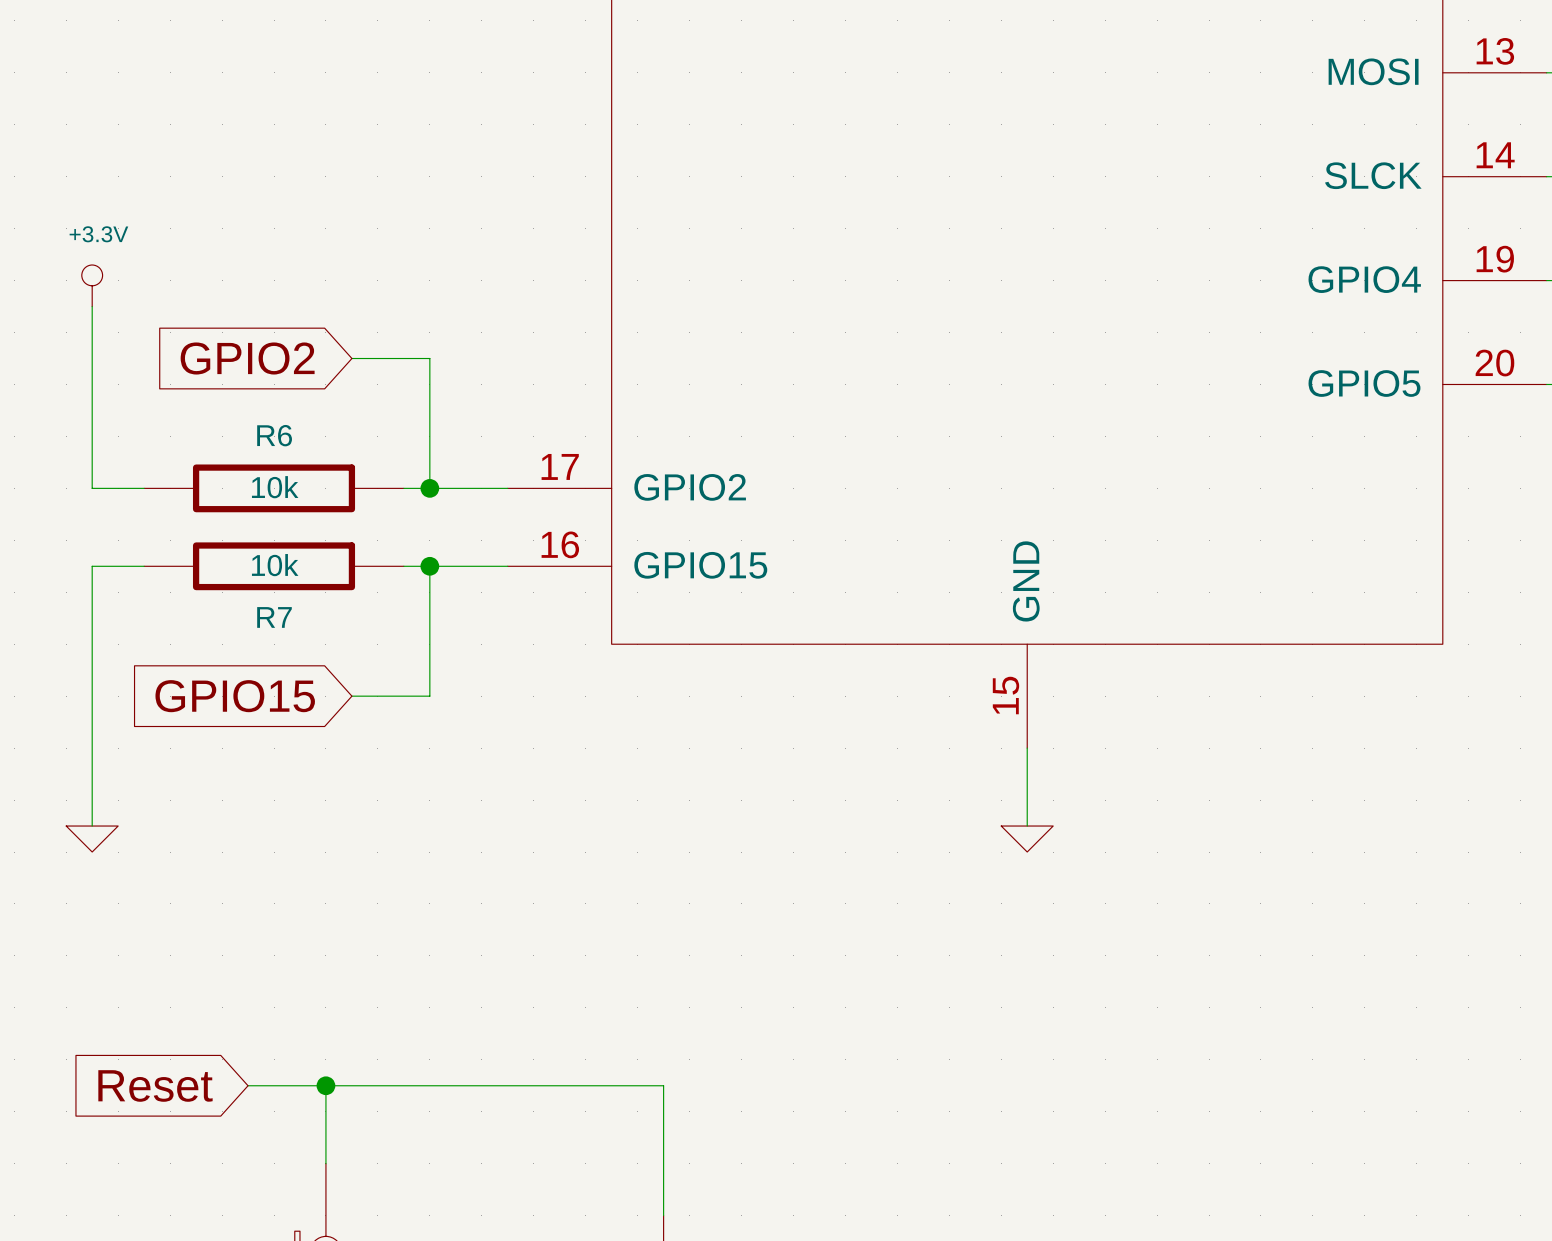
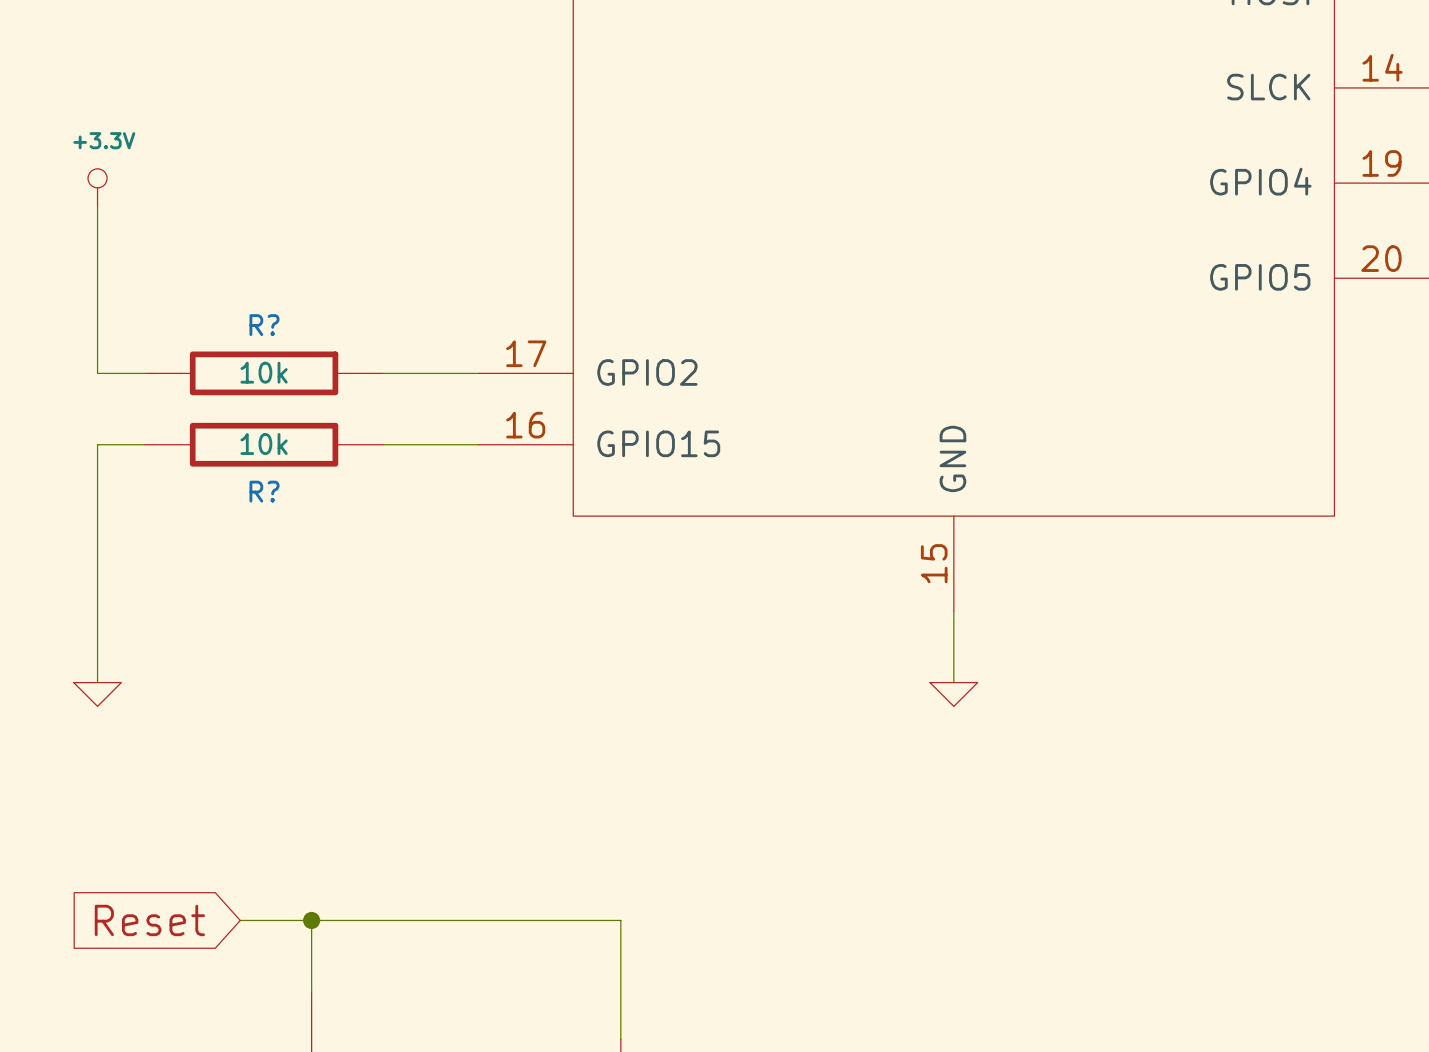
global label: GPIO2 (247, 358) -> none
wire: (351, 358) (429, 358) (429, 488) -> none
R6 name: R6 (274, 435) -> R? (264, 325)
junction: (429, 488) -> none
wire: (429, 566) (429, 696) (351, 696) -> none
junction: (429, 566) -> none
R7 name: R7 (274, 617) -> R? (264, 491)
global label: GPIO15 (235, 696) -> none

